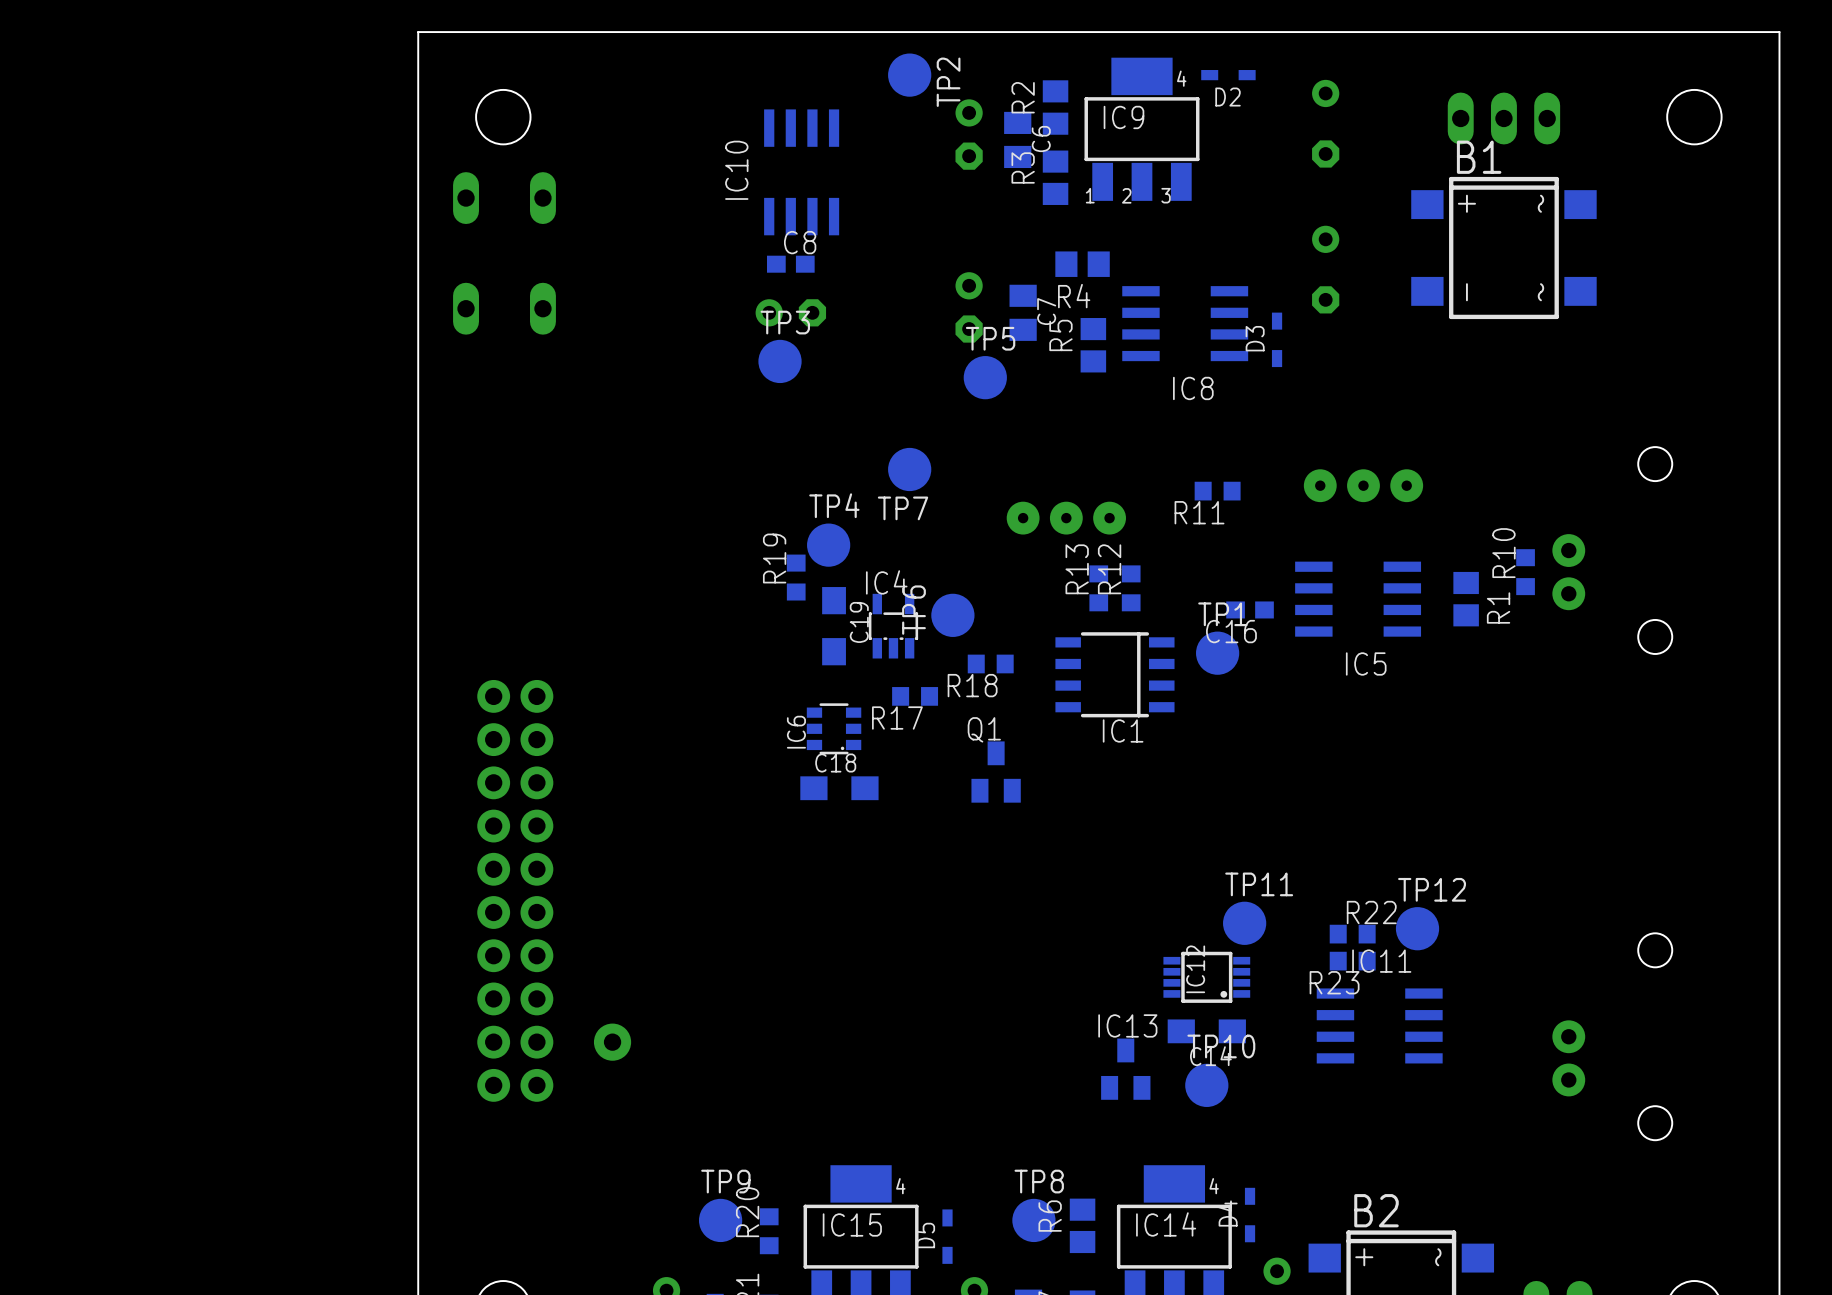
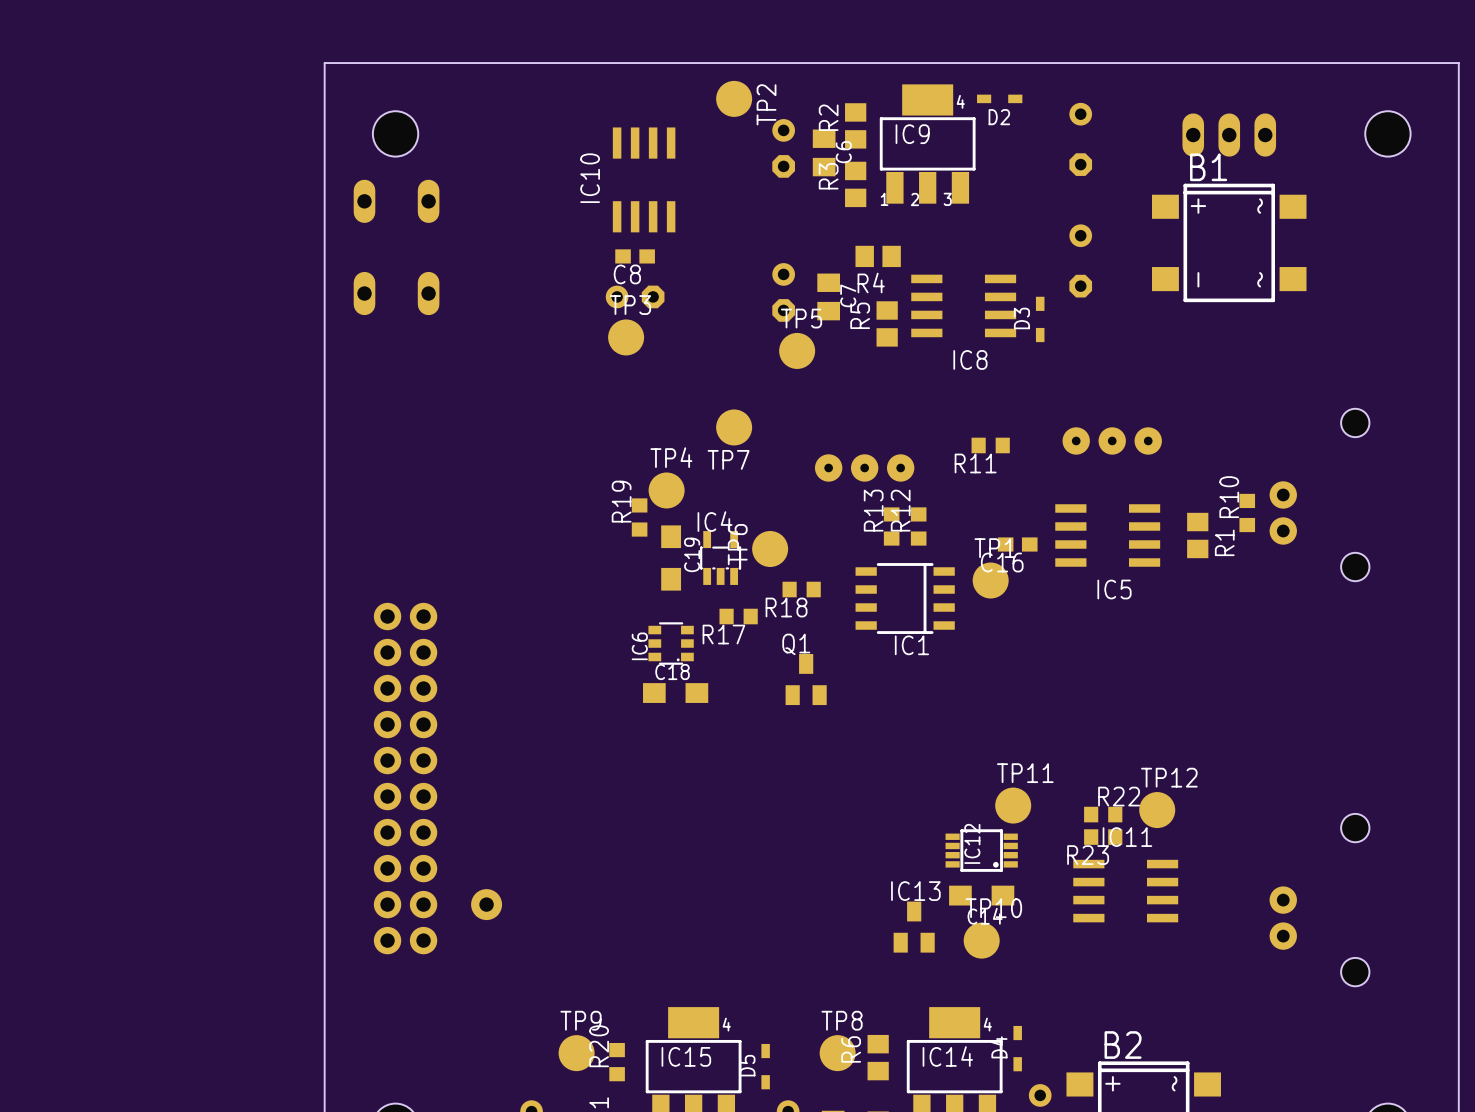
C8 name position: C8 (800, 242) -> C8 (627, 274)

